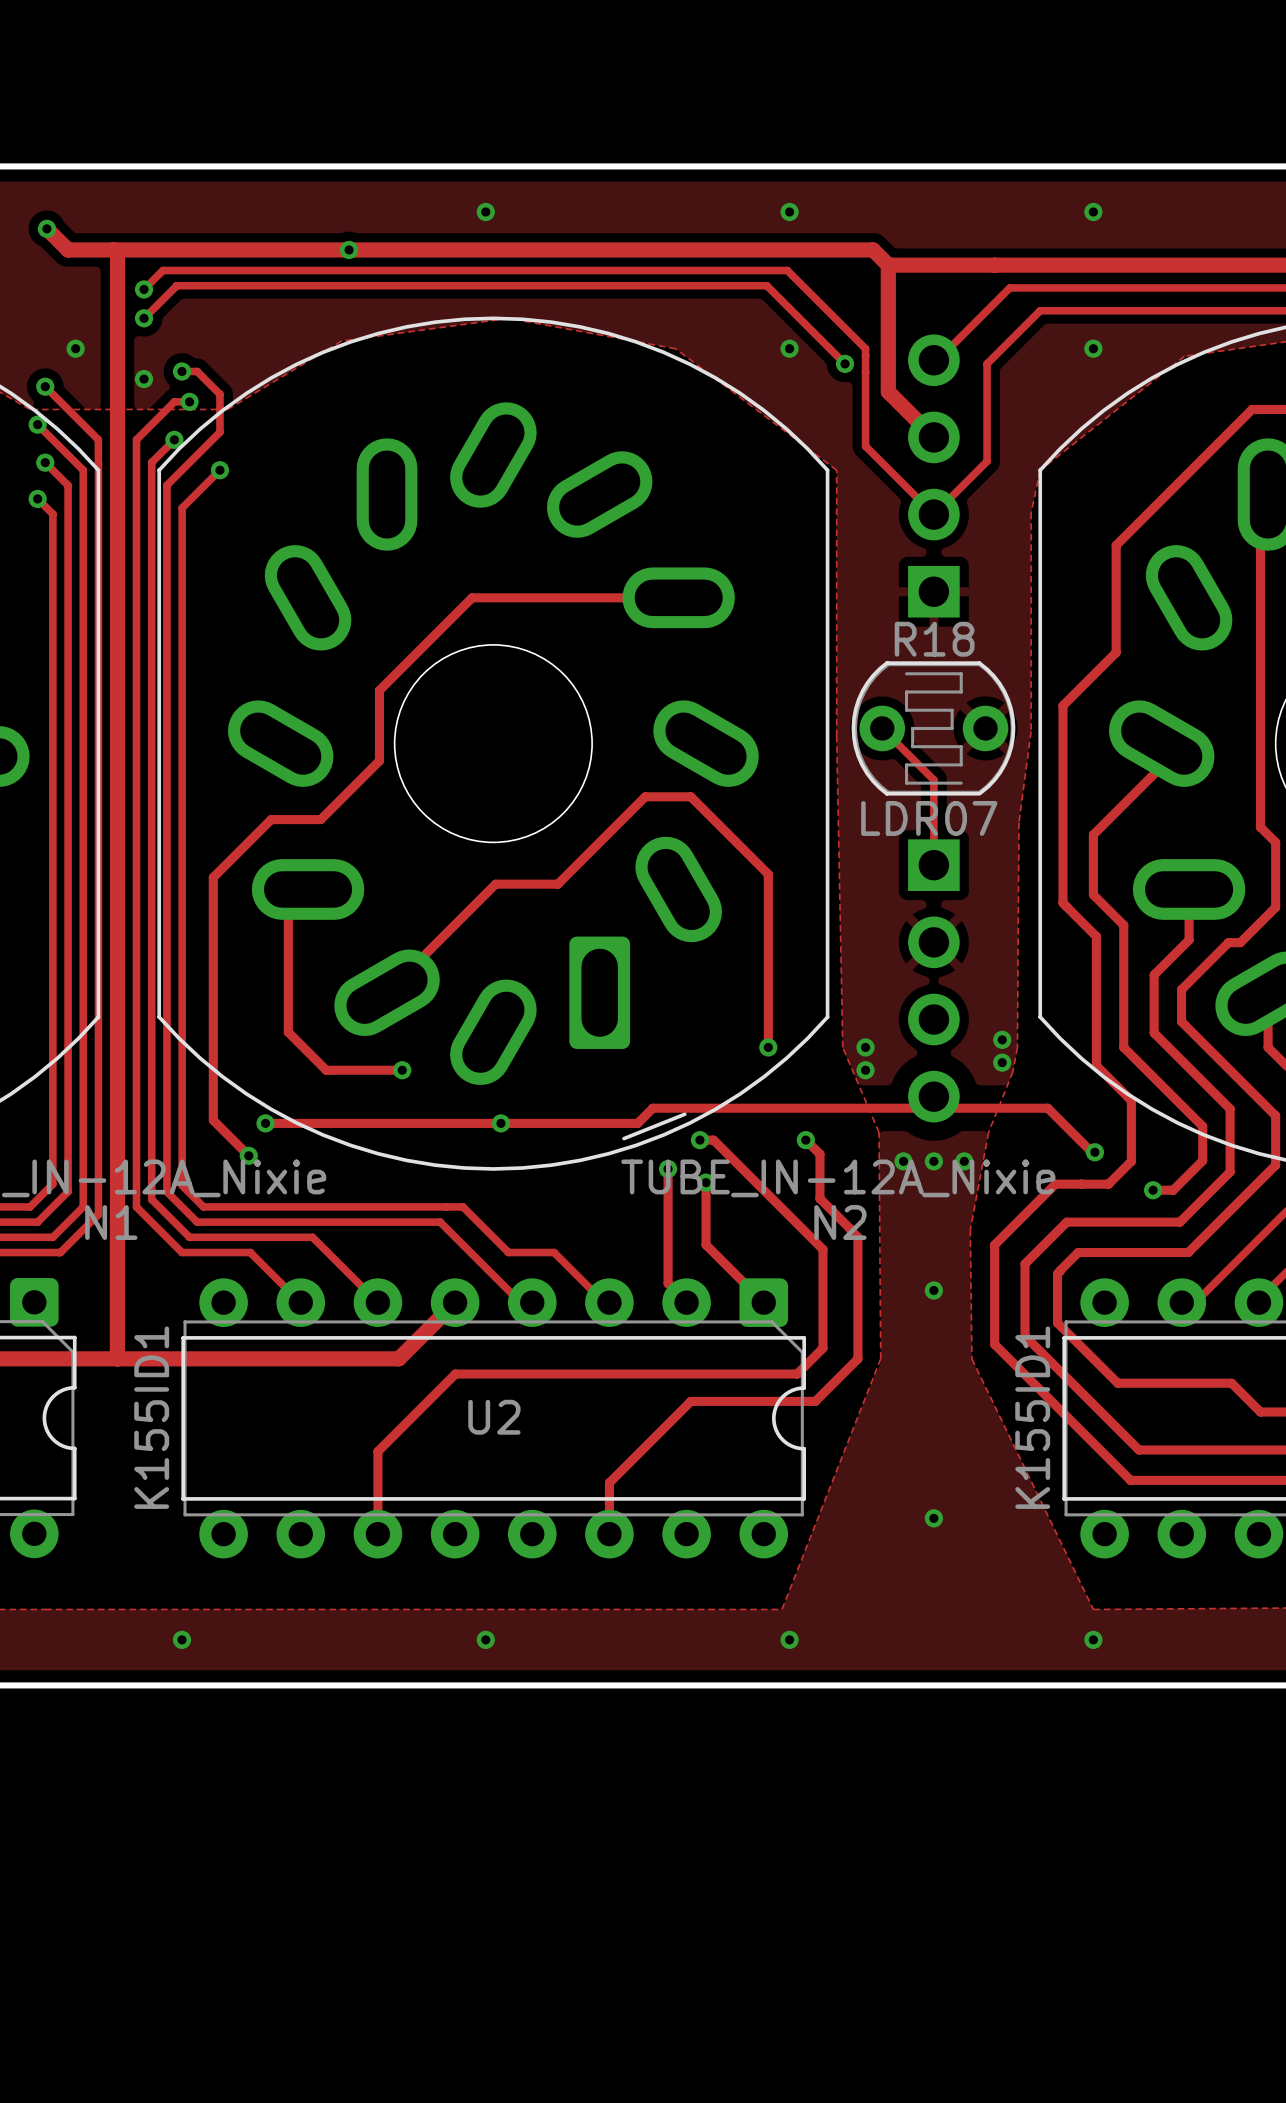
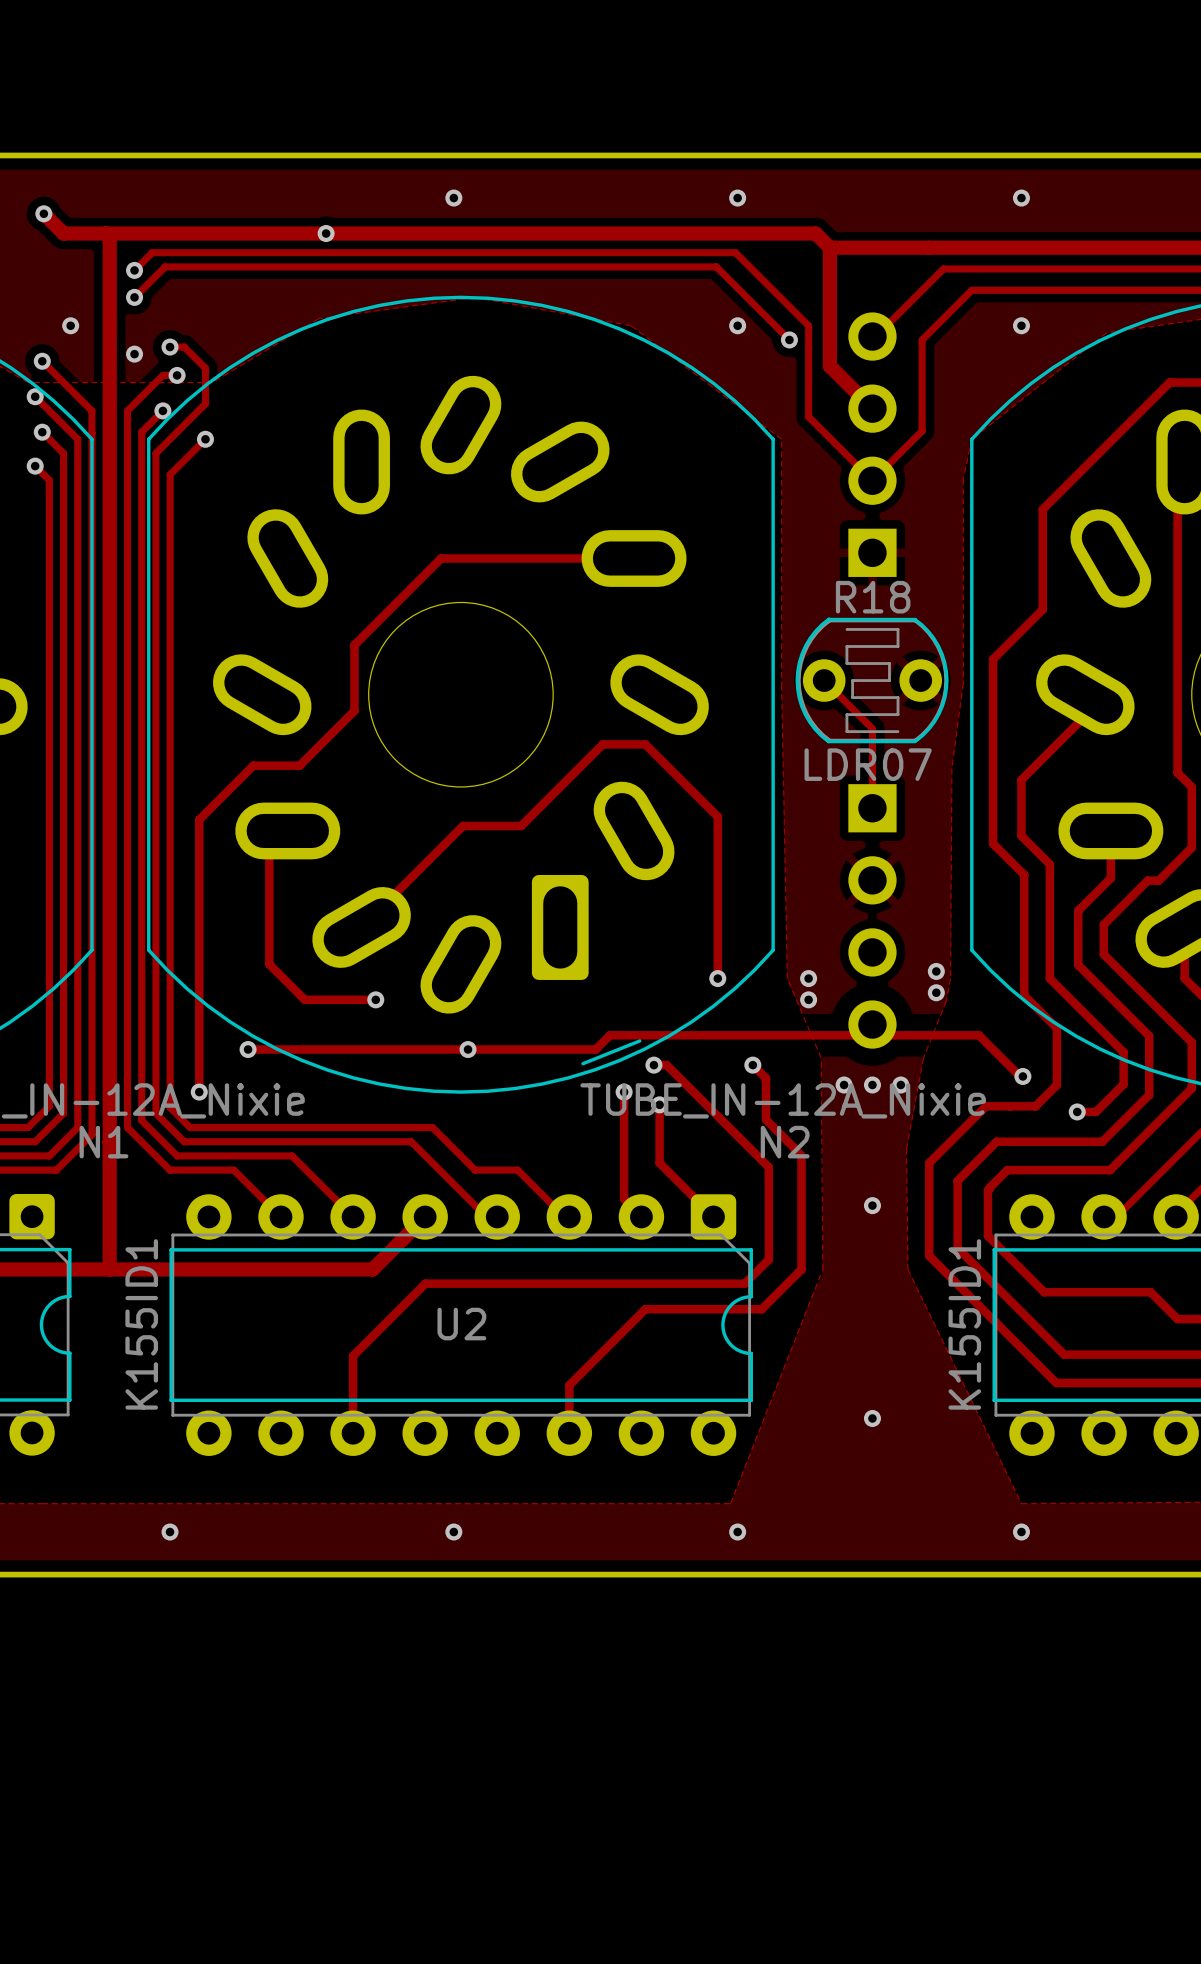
track: (213, 1120) (248, 1155) -> (199, 1046) (199, 1092)
via position: (248, 1155) -> (199, 1092)

